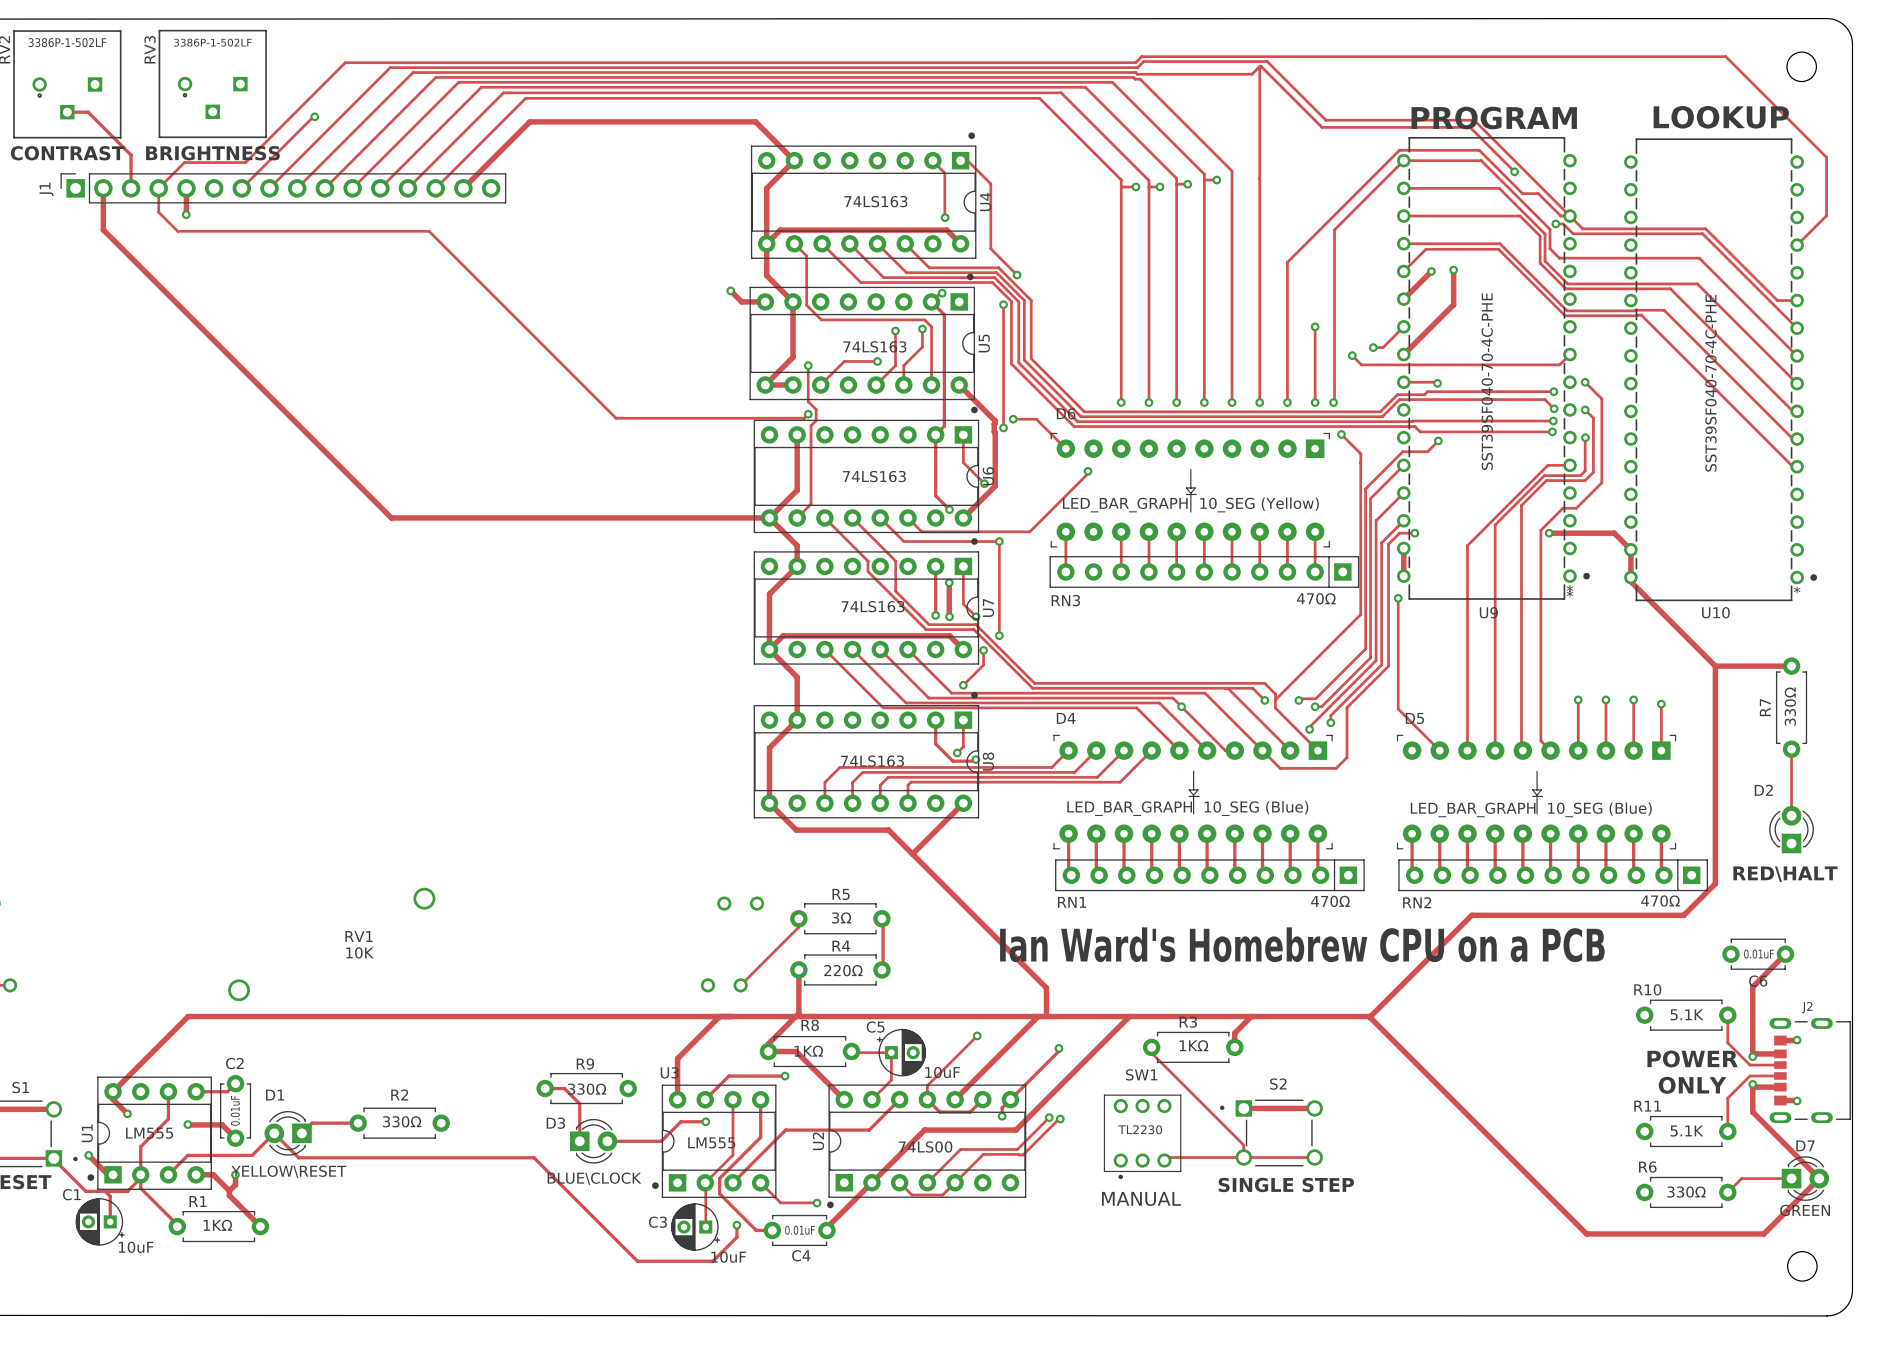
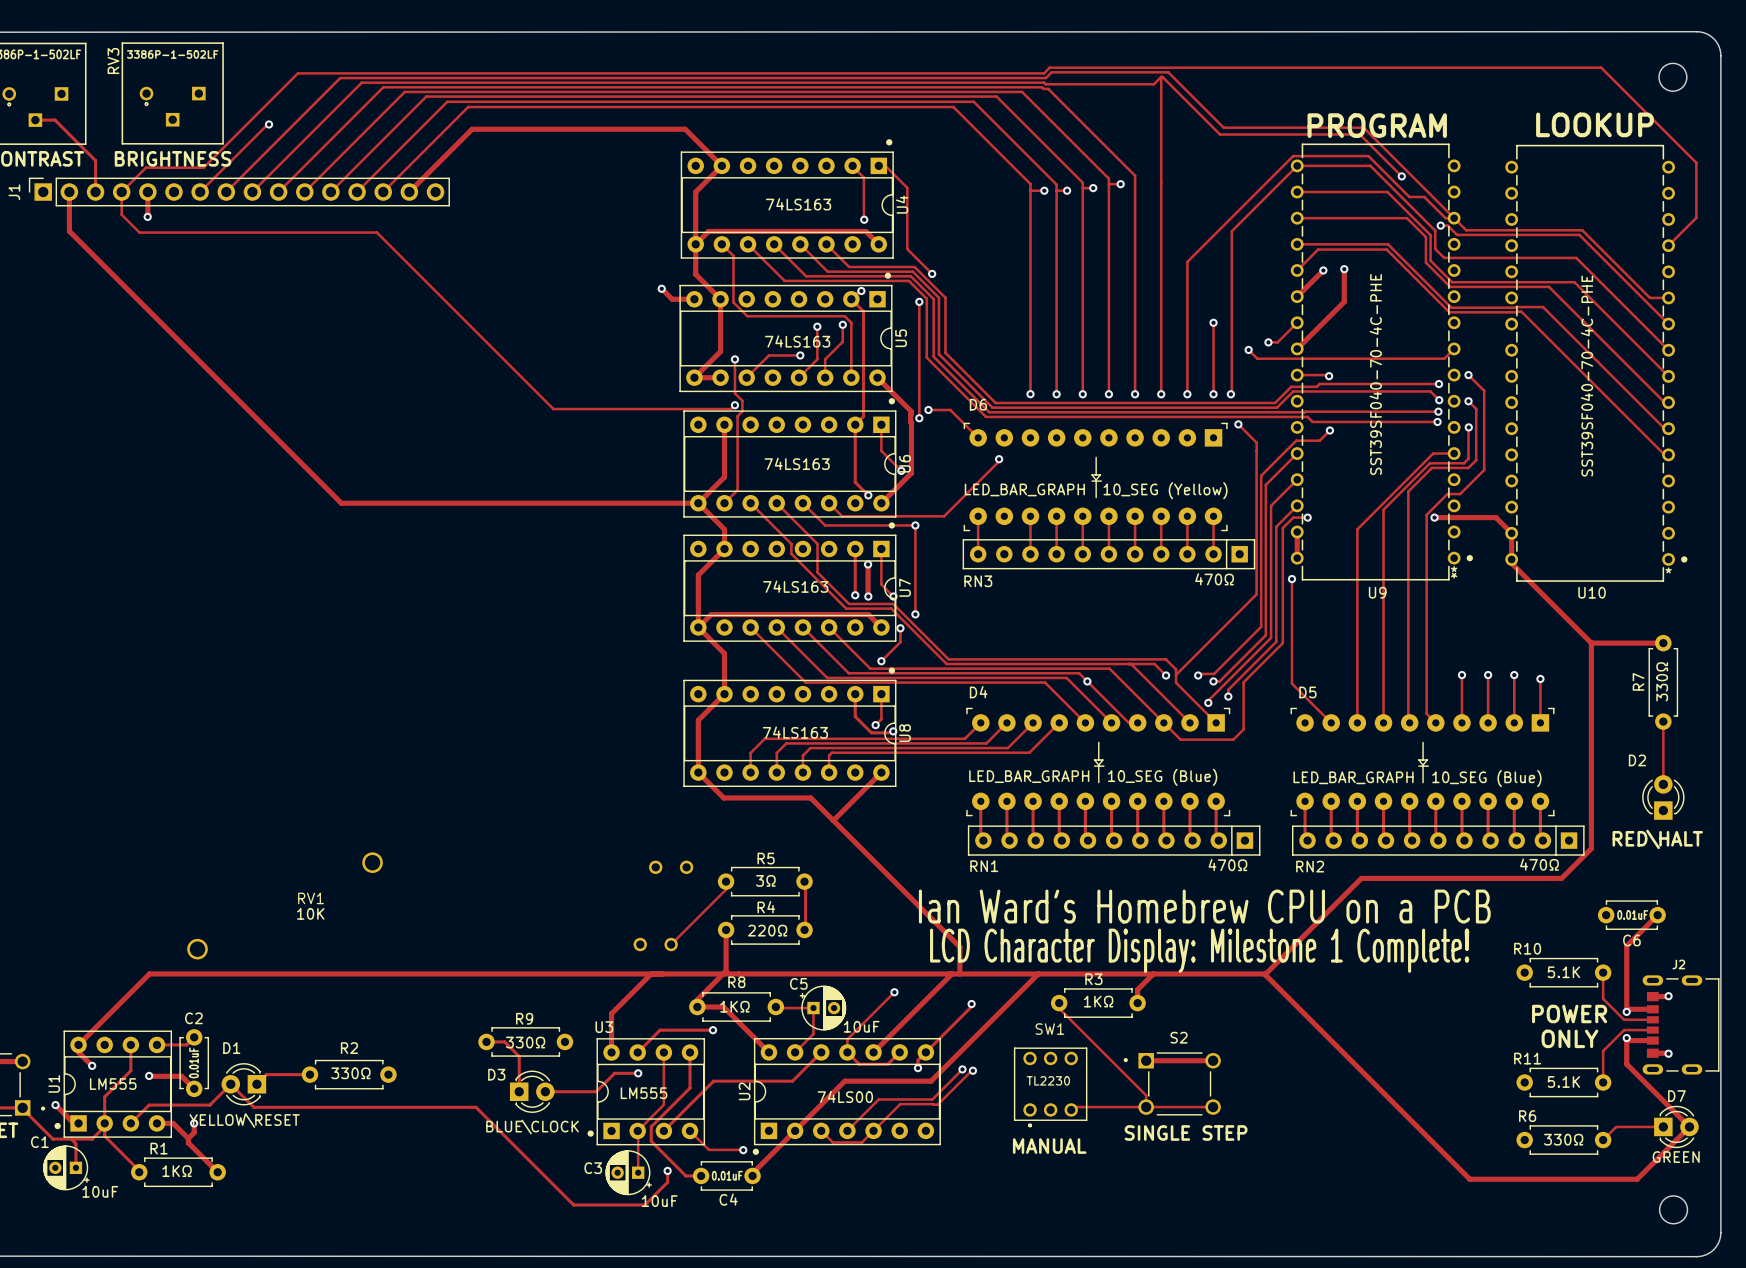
text: none -> LCD Character Display: Milestone 1 Complete! (1199, 950)

